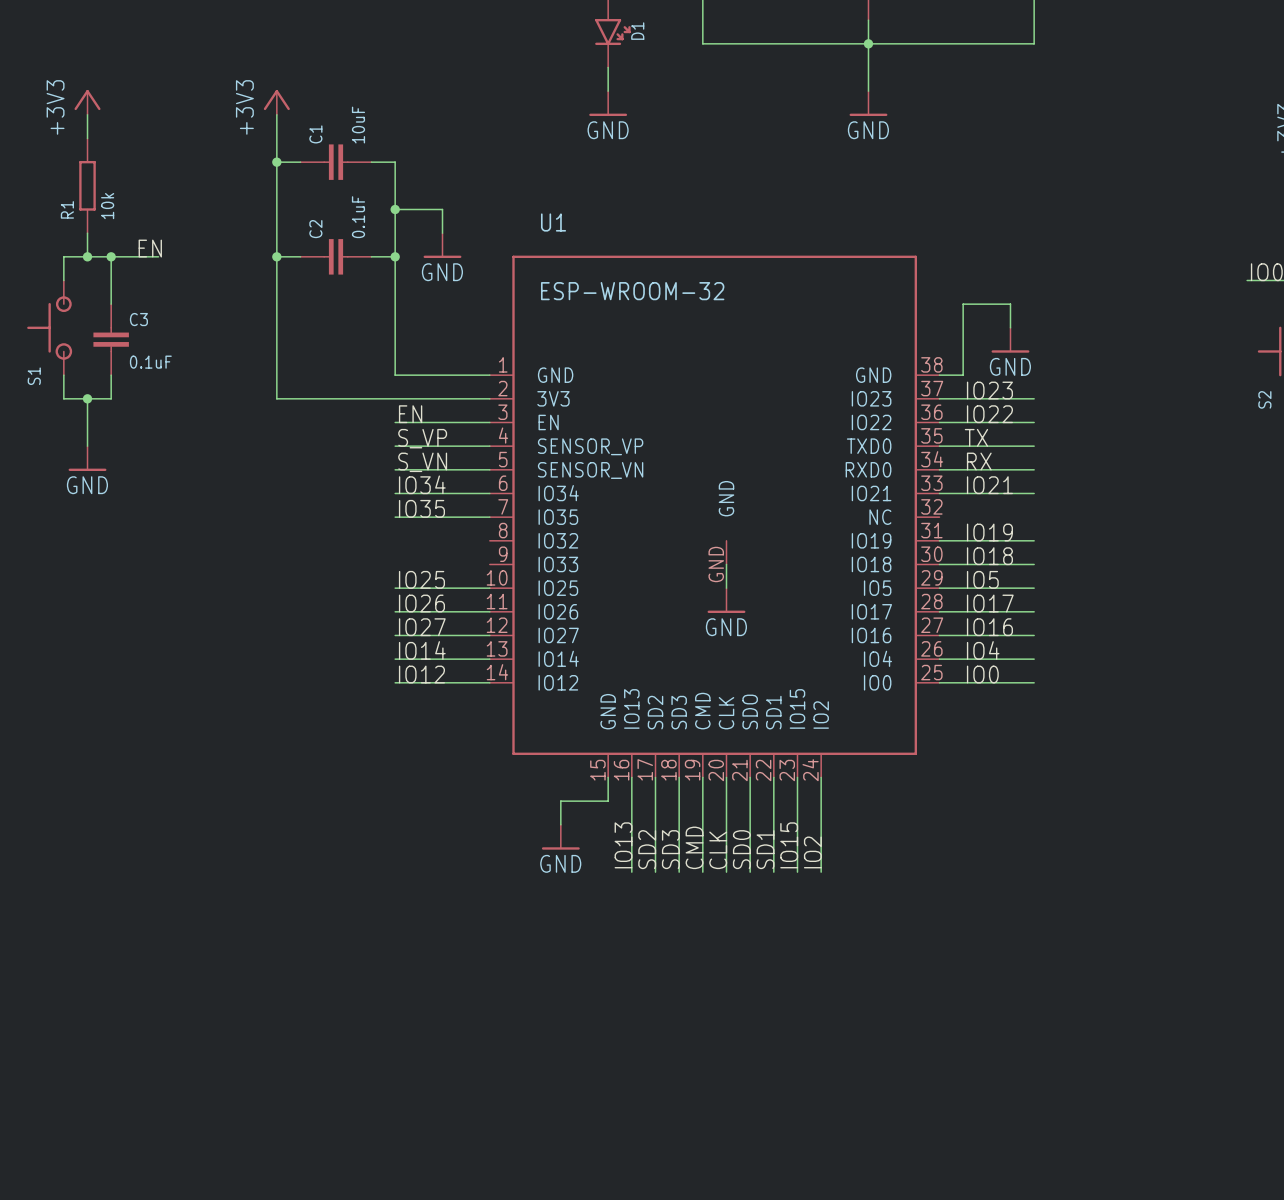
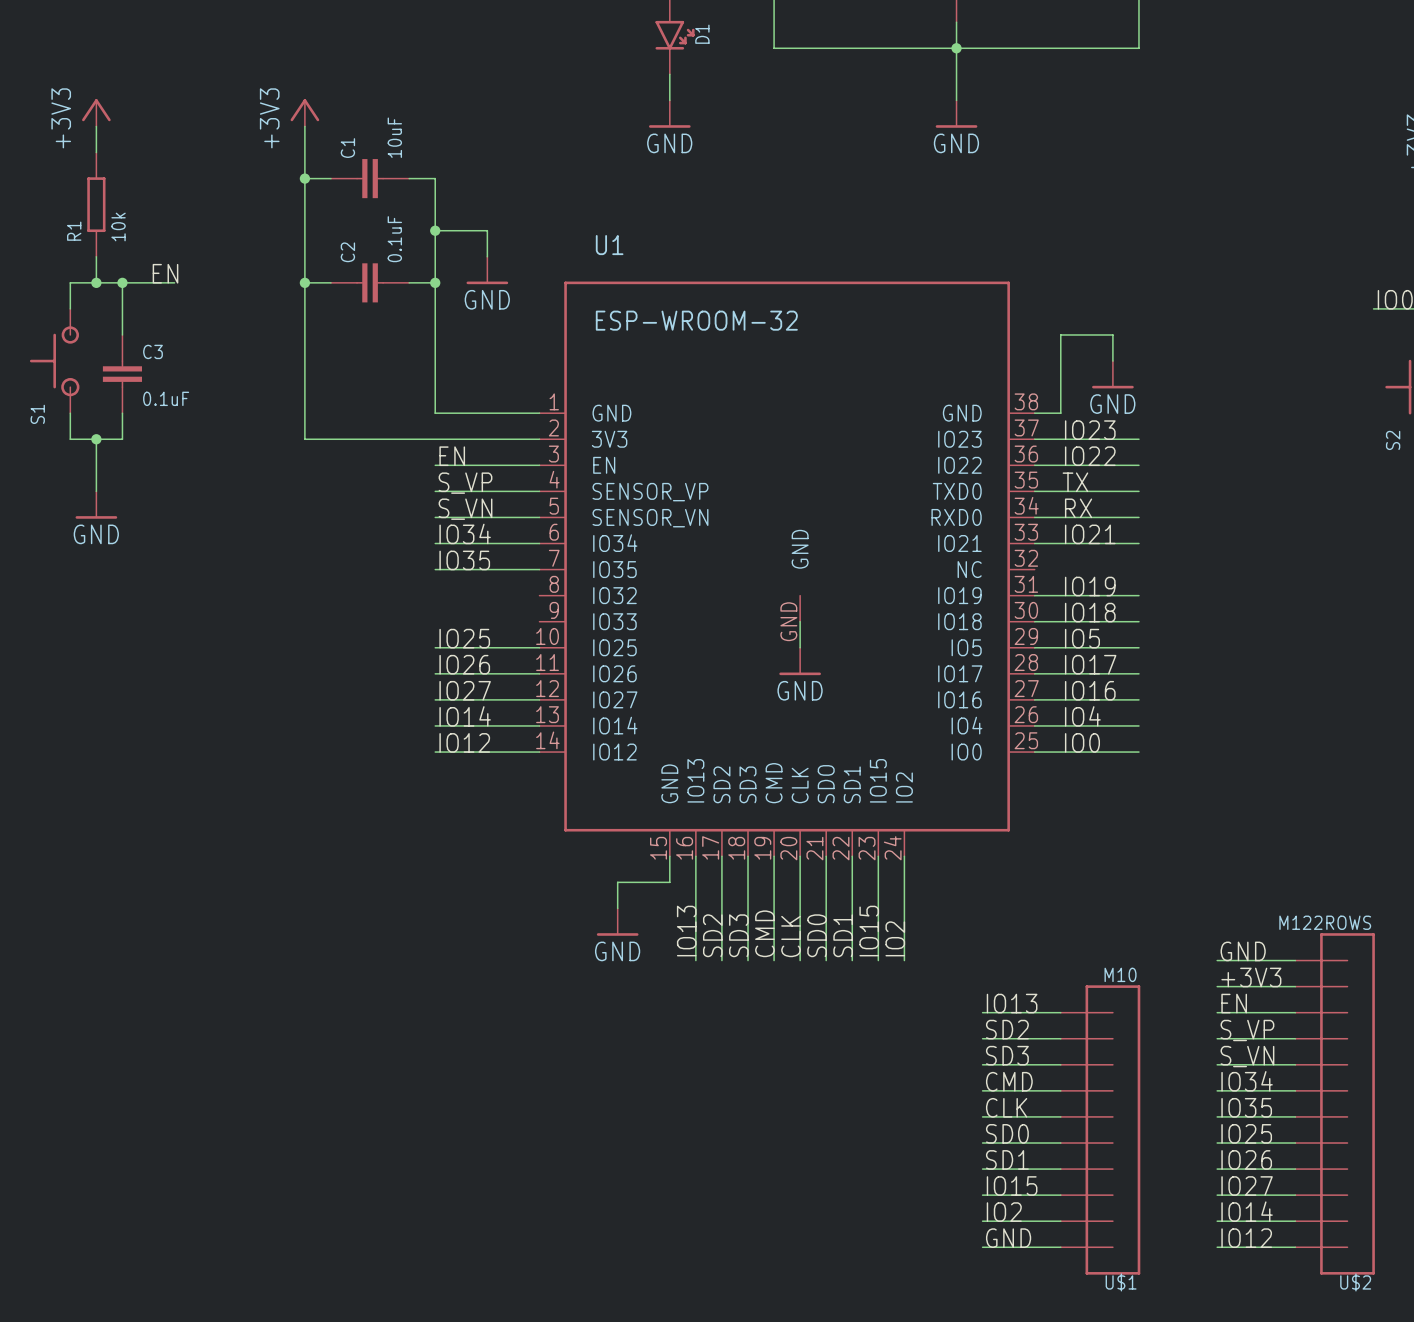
label: none -> GND (1243, 951)
wire: none -> (1217, 960) (1295, 960)
label: none -> +3V3 (1251, 977)
wire: none -> (1217, 986) (1295, 986)
label: none -> IO13 (1012, 1003)
label: none -> EN (1234, 1003)
wire: none -> (982, 1012) (1060, 1012)
wire: none -> (1217, 1012) (1295, 1012)
label: none -> SD2 (1007, 1029)
label: none -> S_VP (1247, 1030)
wire: none -> (982, 1038) (1060, 1038)
wire: none -> (1217, 1038) (1295, 1038)
label: none -> SD3 (1007, 1055)
label: none -> S_VN (1247, 1056)
wire: none -> (982, 1064) (1060, 1064)
wire: none -> (1217, 1064) (1295, 1064)
label: none -> IO34 (1247, 1081)
label: none -> CMD (1009, 1081)
wire: none -> (982, 1090) (1060, 1090)
wire: none -> (1217, 1090) (1295, 1090)
U$2: none -> M122ROWS (1335, 1103)
label: none -> CLK (1006, 1107)
label: none -> IO35 (1246, 1107)
wire: none -> (982, 1116) (1060, 1116)
wire: none -> (1217, 1116) (1295, 1116)
U$1: none -> M10 (1100, 1129)
label: none -> SD0 (1007, 1133)
label: none -> IO25 (1246, 1133)
wire: none -> (982, 1143) (1060, 1143)
wire: none -> (1217, 1143) (1295, 1143)
label: none -> SD1 (1007, 1159)
label: none -> IO26 (1246, 1159)
wire: none -> (982, 1169) (1060, 1169)
wire: none -> (1217, 1169) (1295, 1169)
label: none -> IO15 (1012, 1186)
label: none -> IO27 (1247, 1186)
wire: none -> (982, 1195) (1060, 1195)
wire: none -> (1217, 1195) (1295, 1195)
label: none -> IO2 (1004, 1212)
label: none -> IO14 (1247, 1211)
wire: none -> (982, 1221) (1060, 1221)
wire: none -> (1217, 1221) (1295, 1221)
label: none -> GND (1008, 1238)
label: none -> IO12 (1246, 1238)
wire: none -> (982, 1247) (1060, 1247)
wire: none -> (1217, 1247) (1295, 1247)

